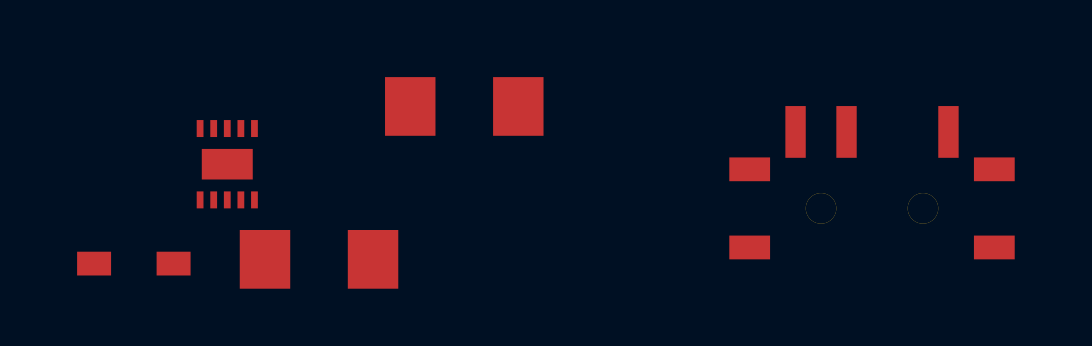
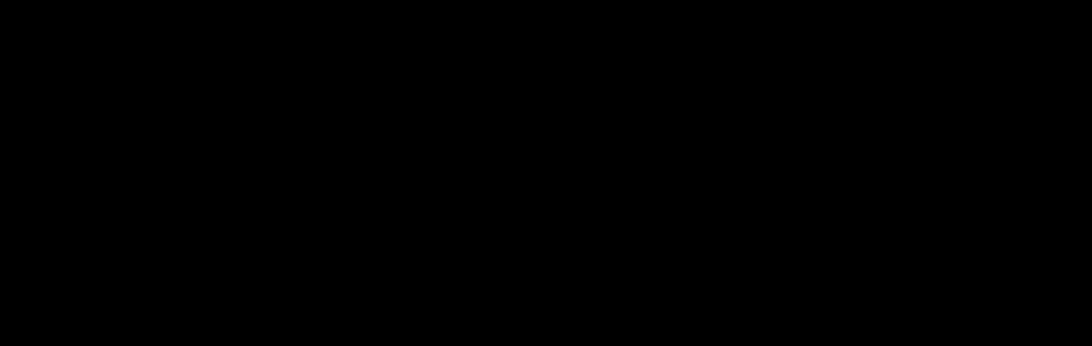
part: (464, 106) -> none
part: (227, 164) -> none
part: (872, 182) -> none
part: (319, 259) -> none
part: (133, 263) -> none

